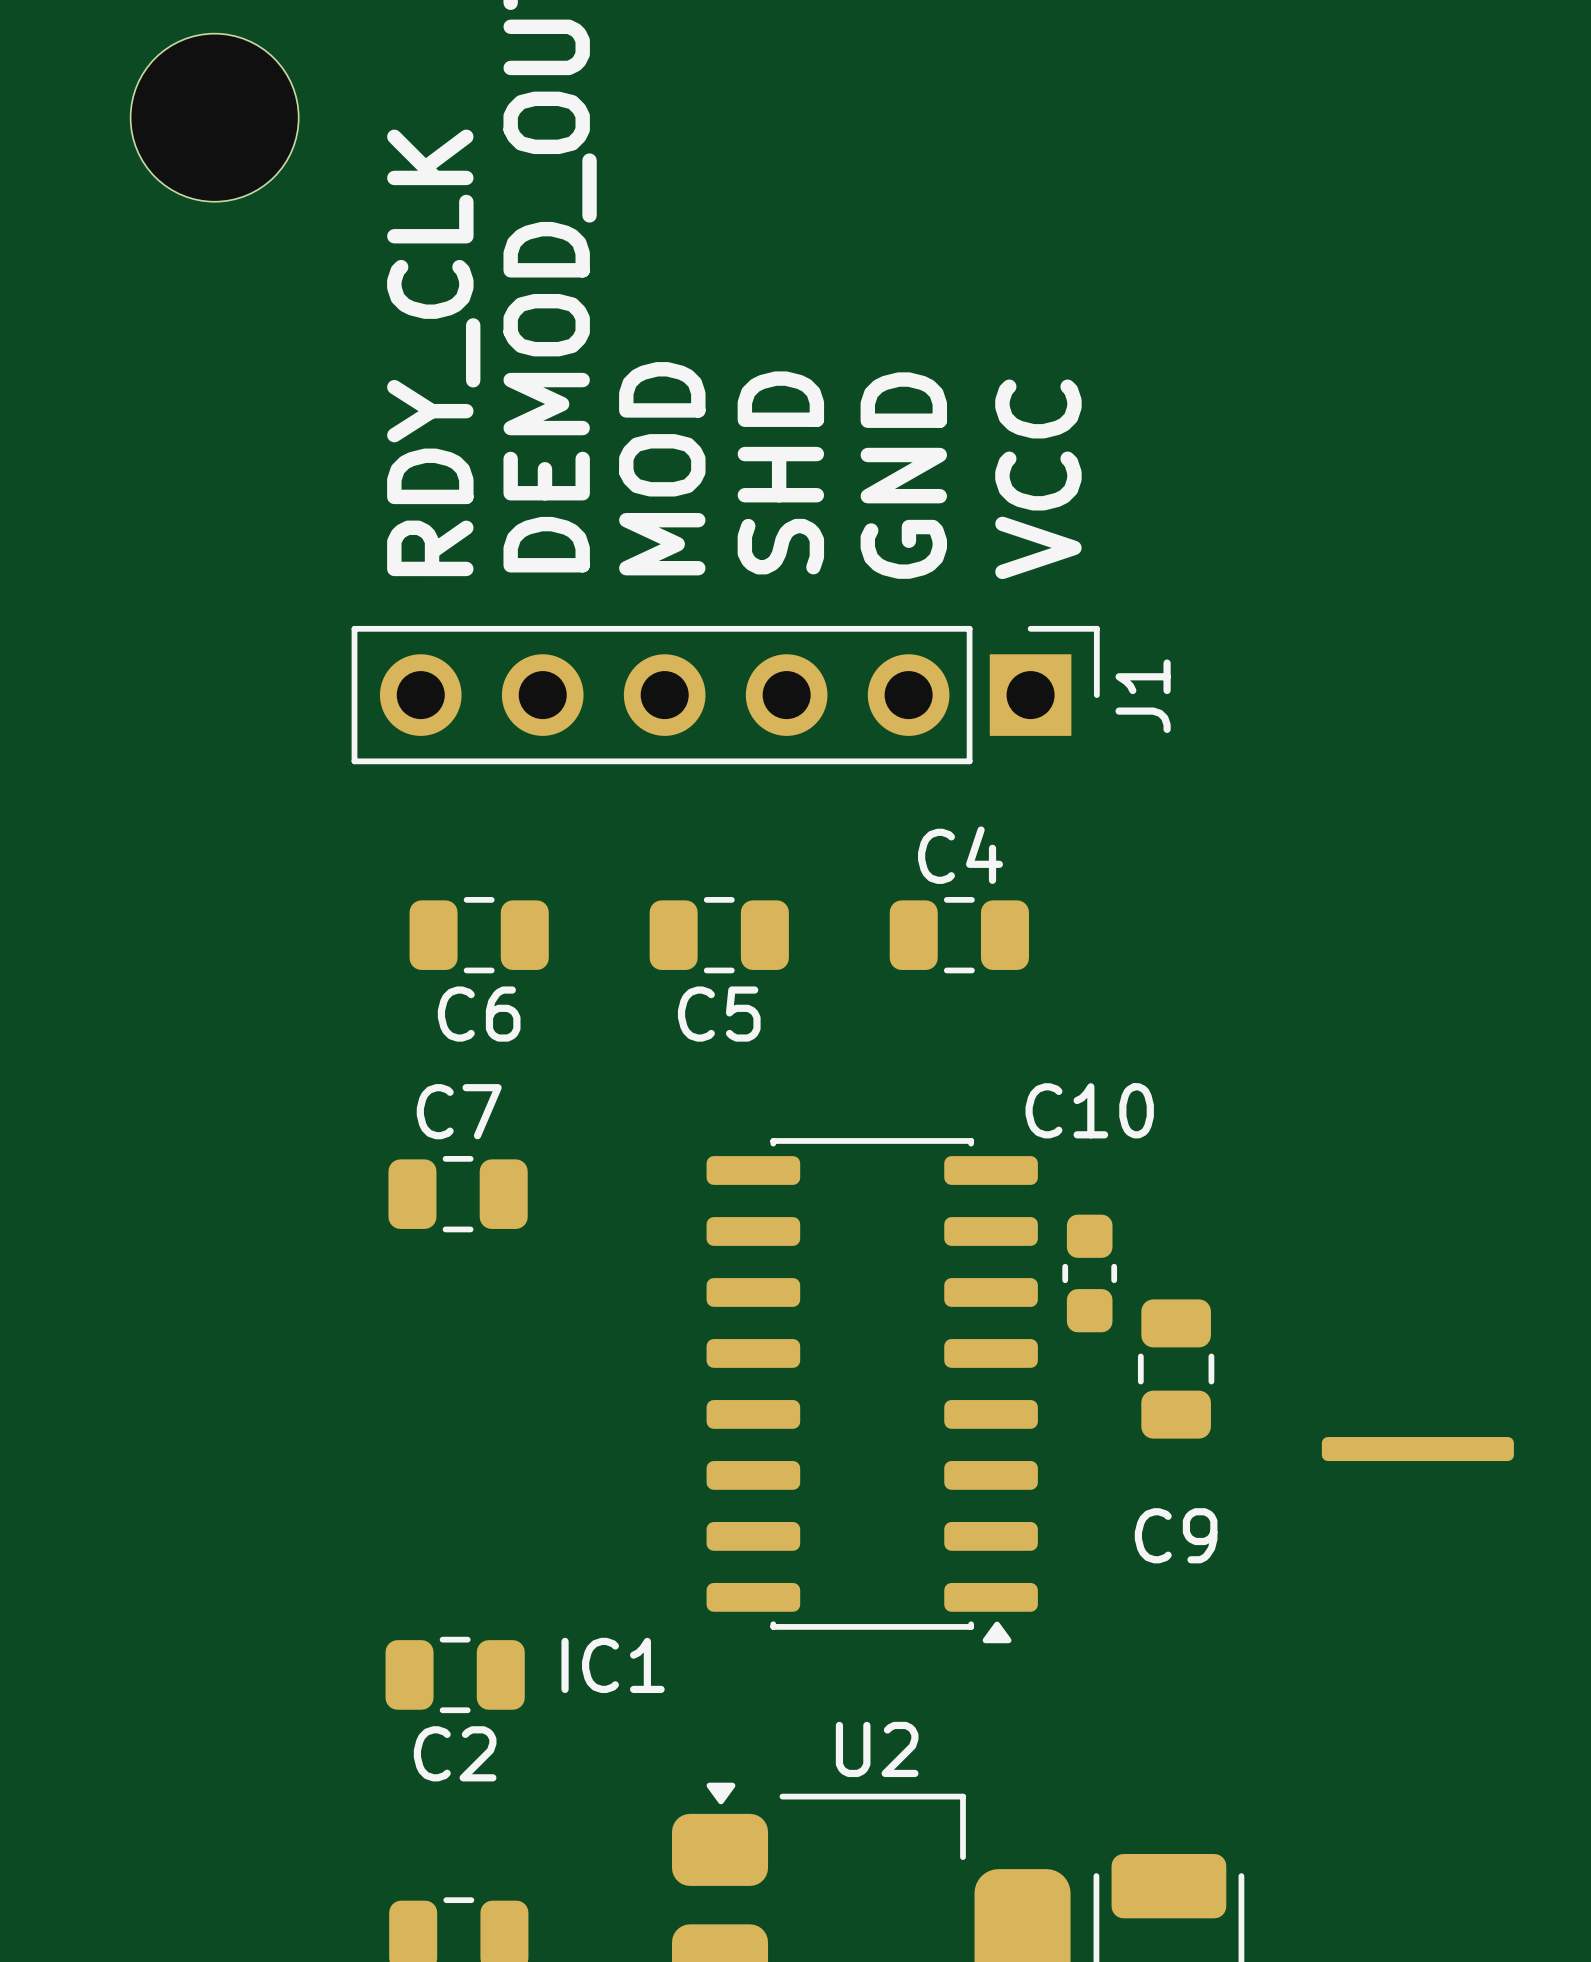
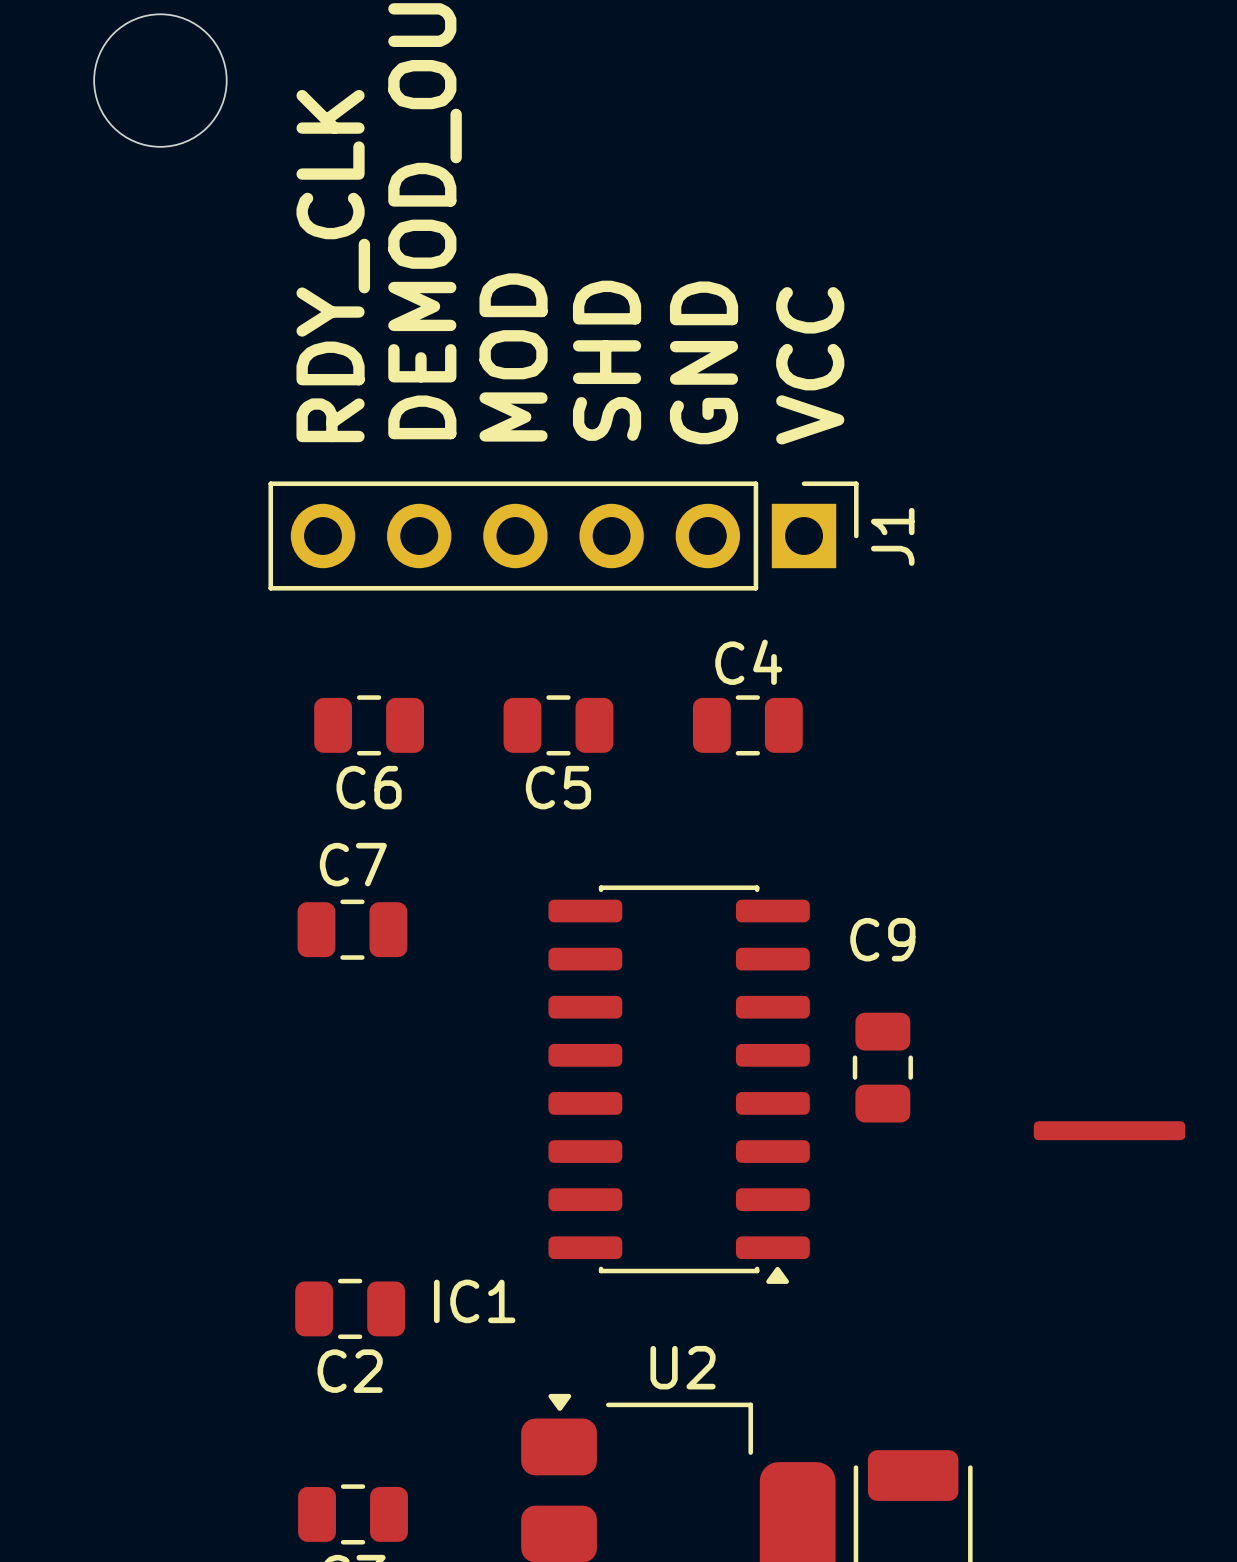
C10: (1089, 1273) -> none
C9 position: (1176, 1369) -> (882, 1067)
C9 name position: C9 (1176, 1535) -> C9 (882, 939)

